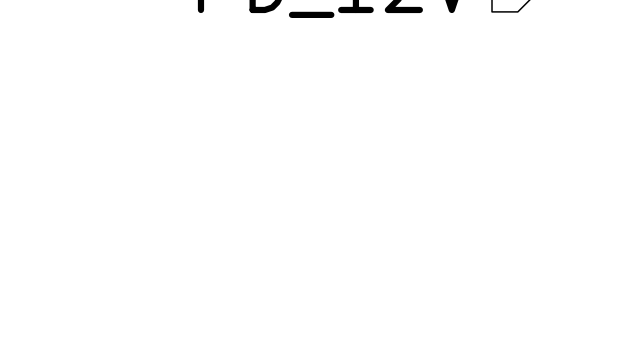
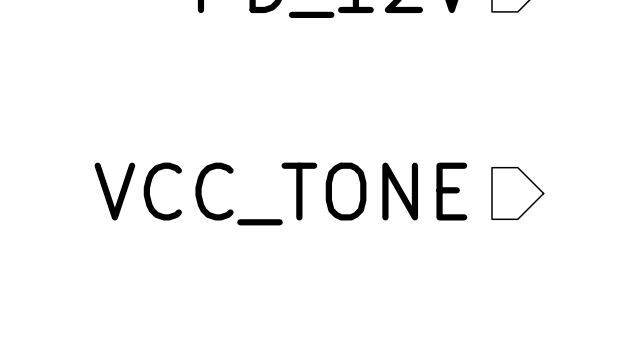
hierarchical label: none -> VCC_TONE (280, 194)

